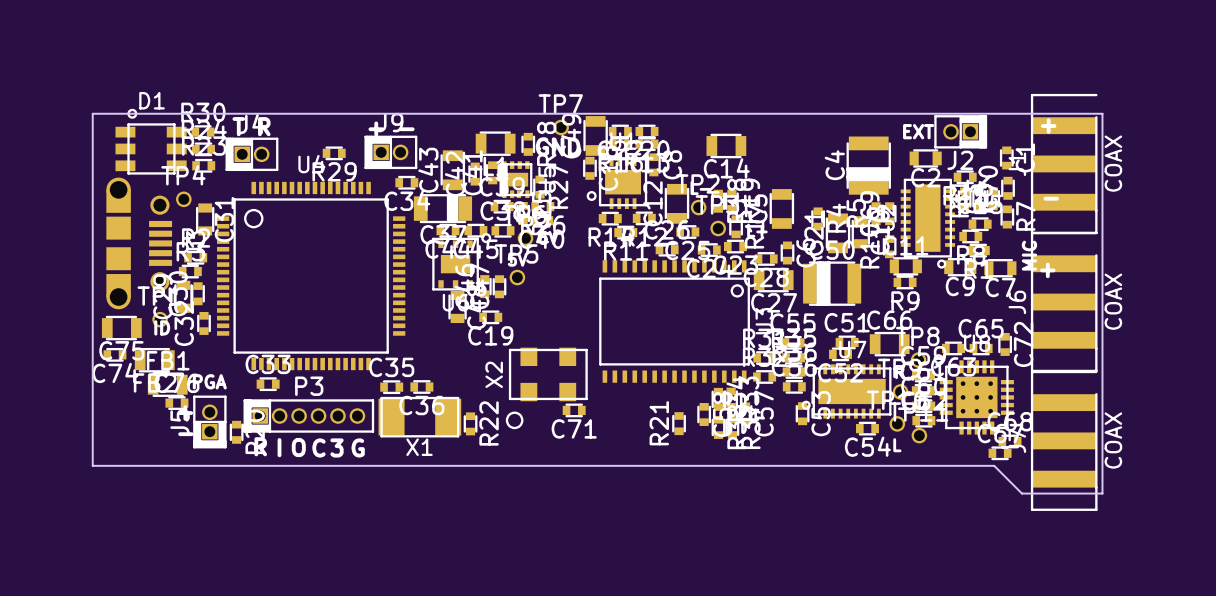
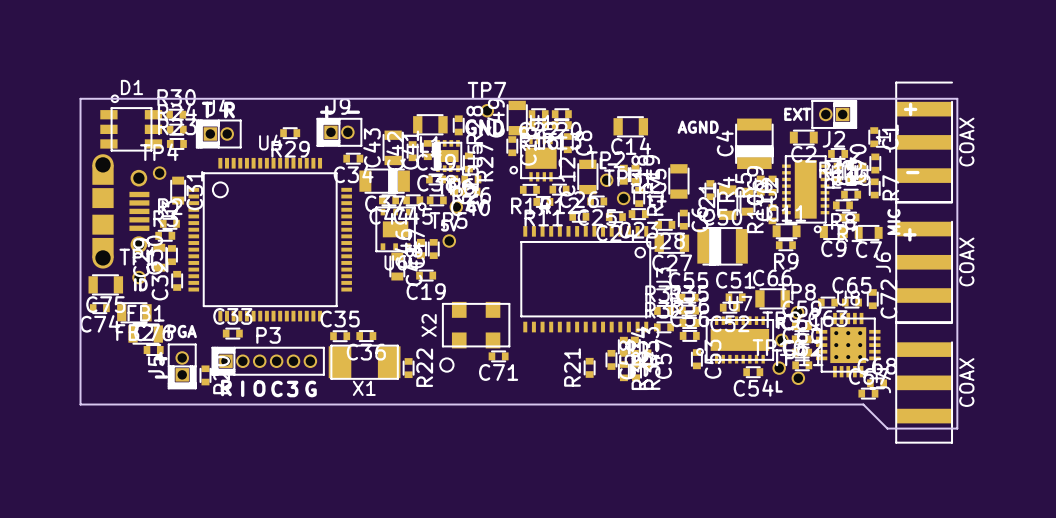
text: none -> AGND (698, 127)

